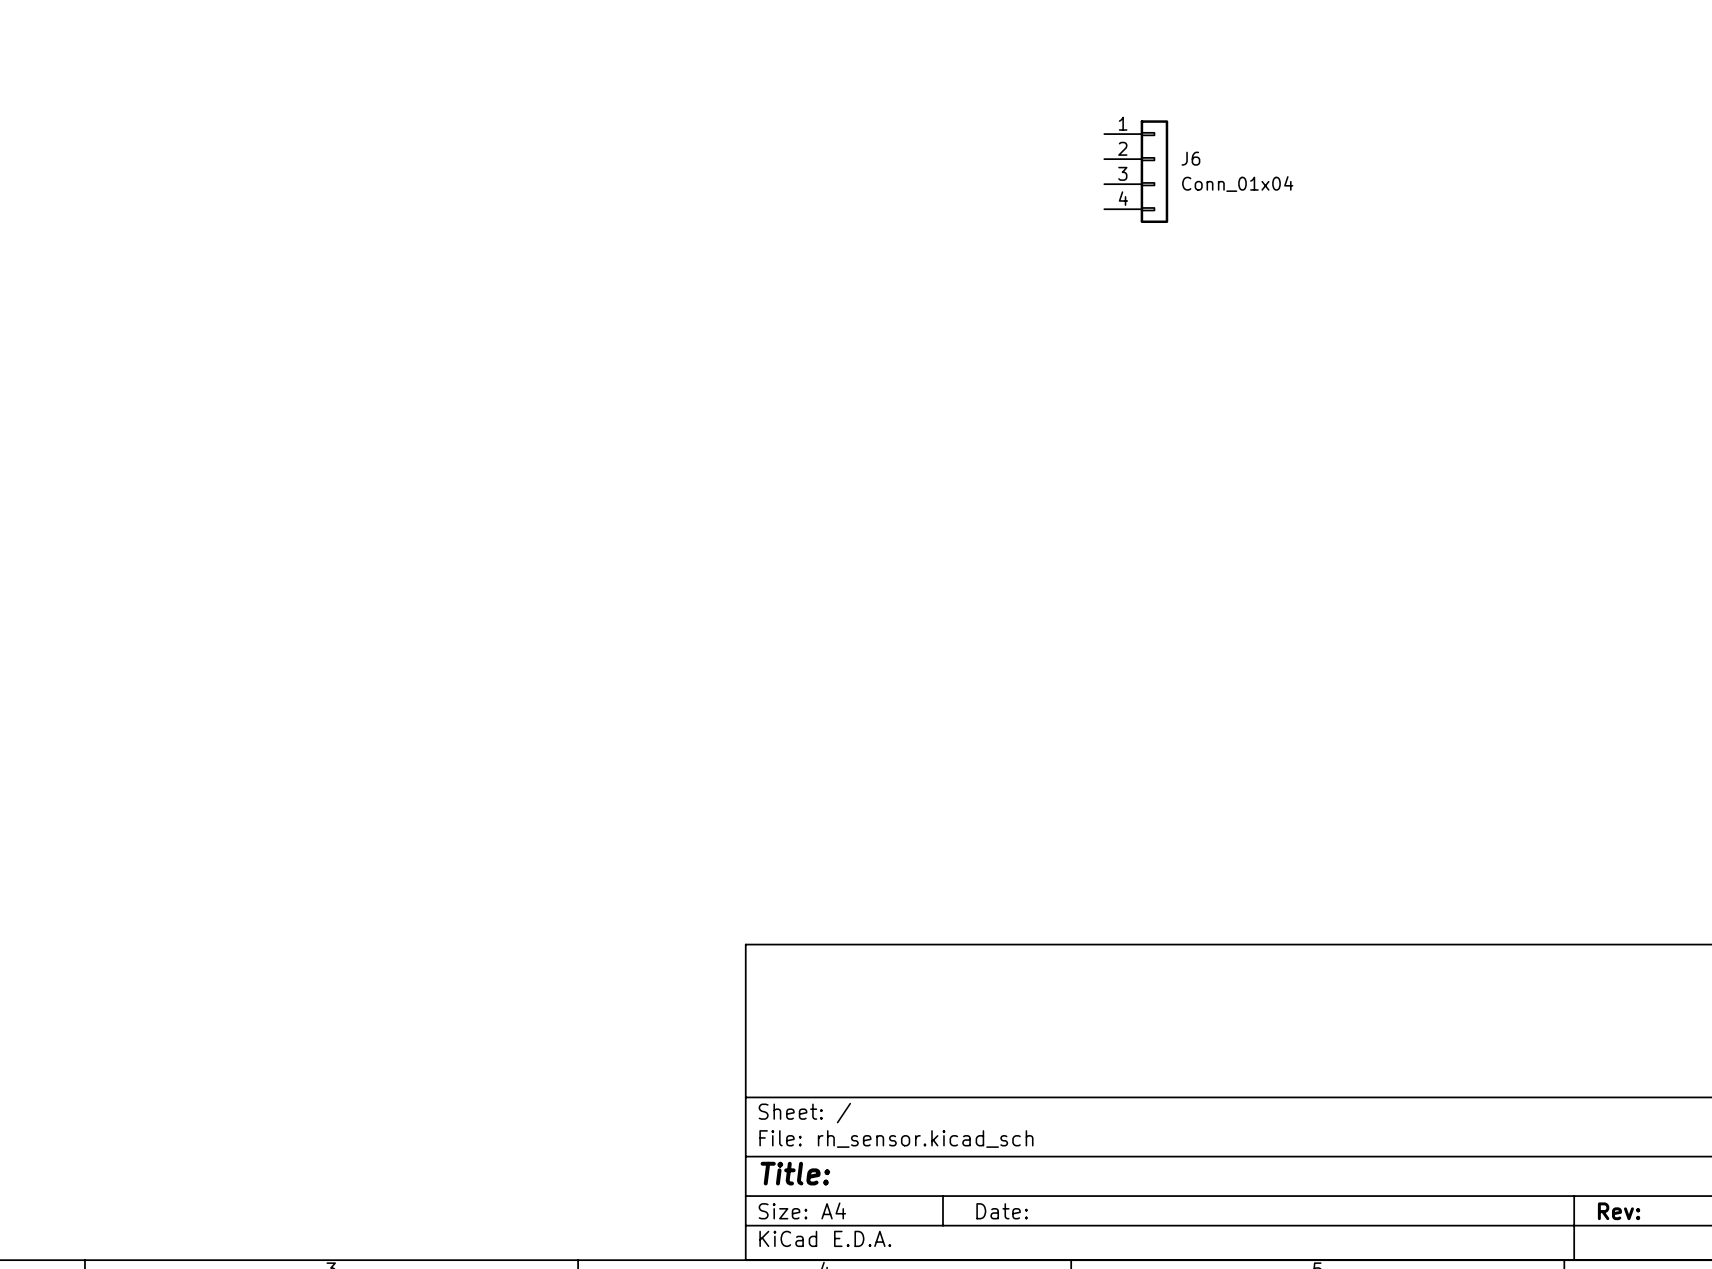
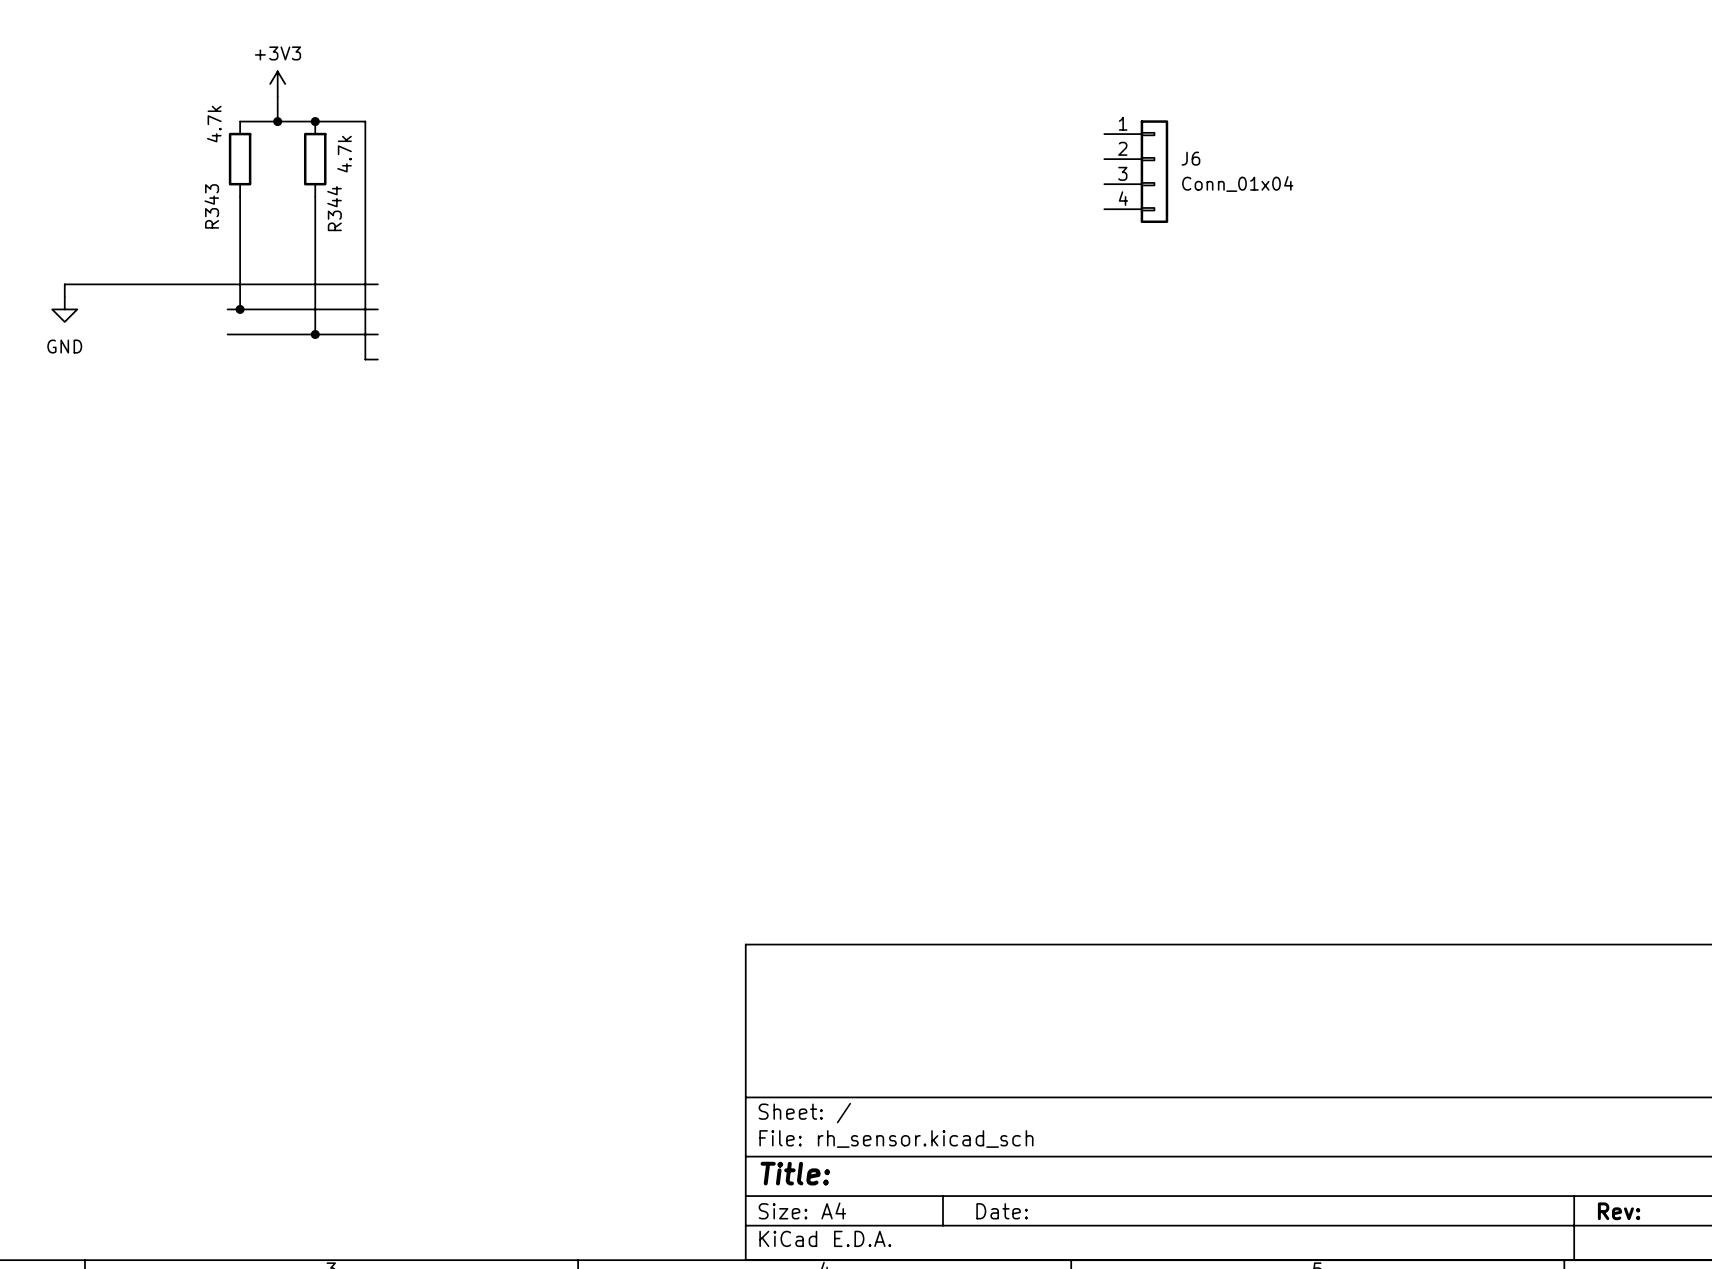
power symbol: none -> +3V3 (277, 83)
wire: none -> (277, 96) (277, 121)
wire: none -> (240, 121) (365, 121) (365, 359) (377, 359)
junction: none -> (277, 121)
junction: none -> (315, 121)
R343: none -> 4.7k (240, 159)
R344: none -> 4.7k (315, 159)
wire: none -> (240, 196) (240, 309)
wire: none -> (315, 196) (315, 334)
wire: none -> (377, 284) (64, 284) (64, 296)
power symbol: none -> GND (64, 309)
wire: none -> (227, 309) (377, 309)
junction: none -> (240, 309)
wire: none -> (227, 334) (377, 334)
junction: none -> (315, 334)

